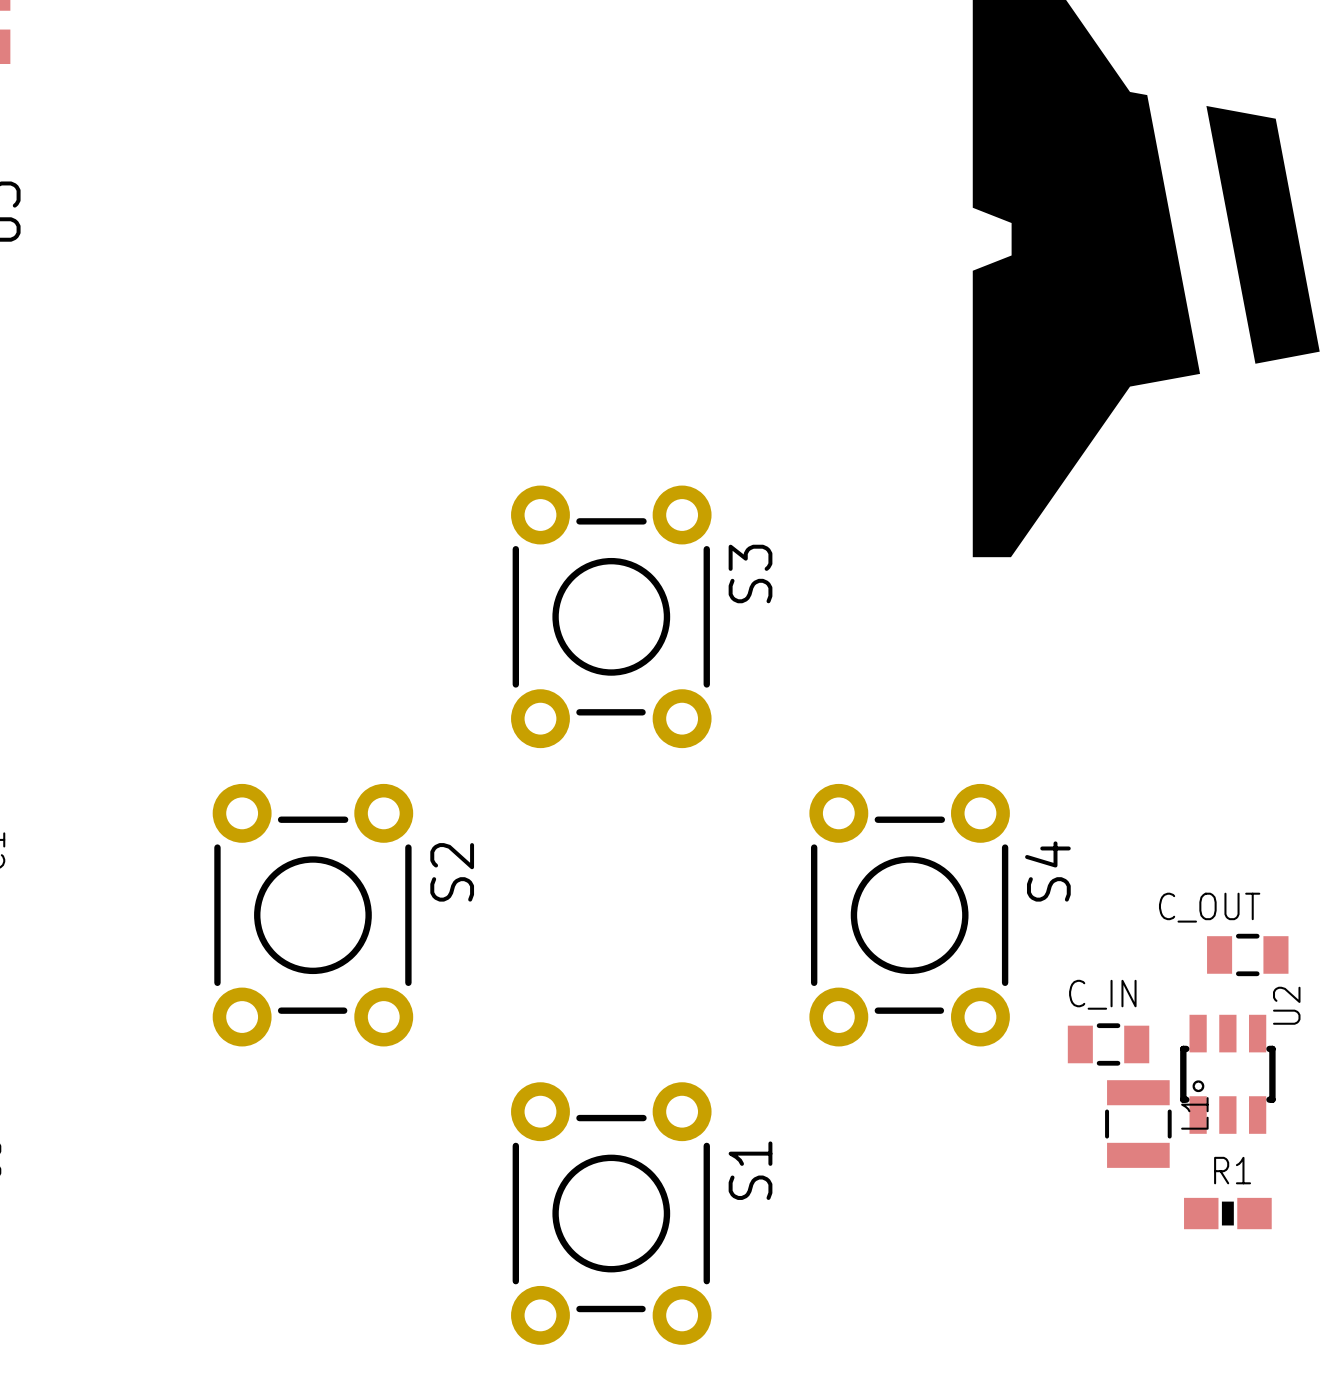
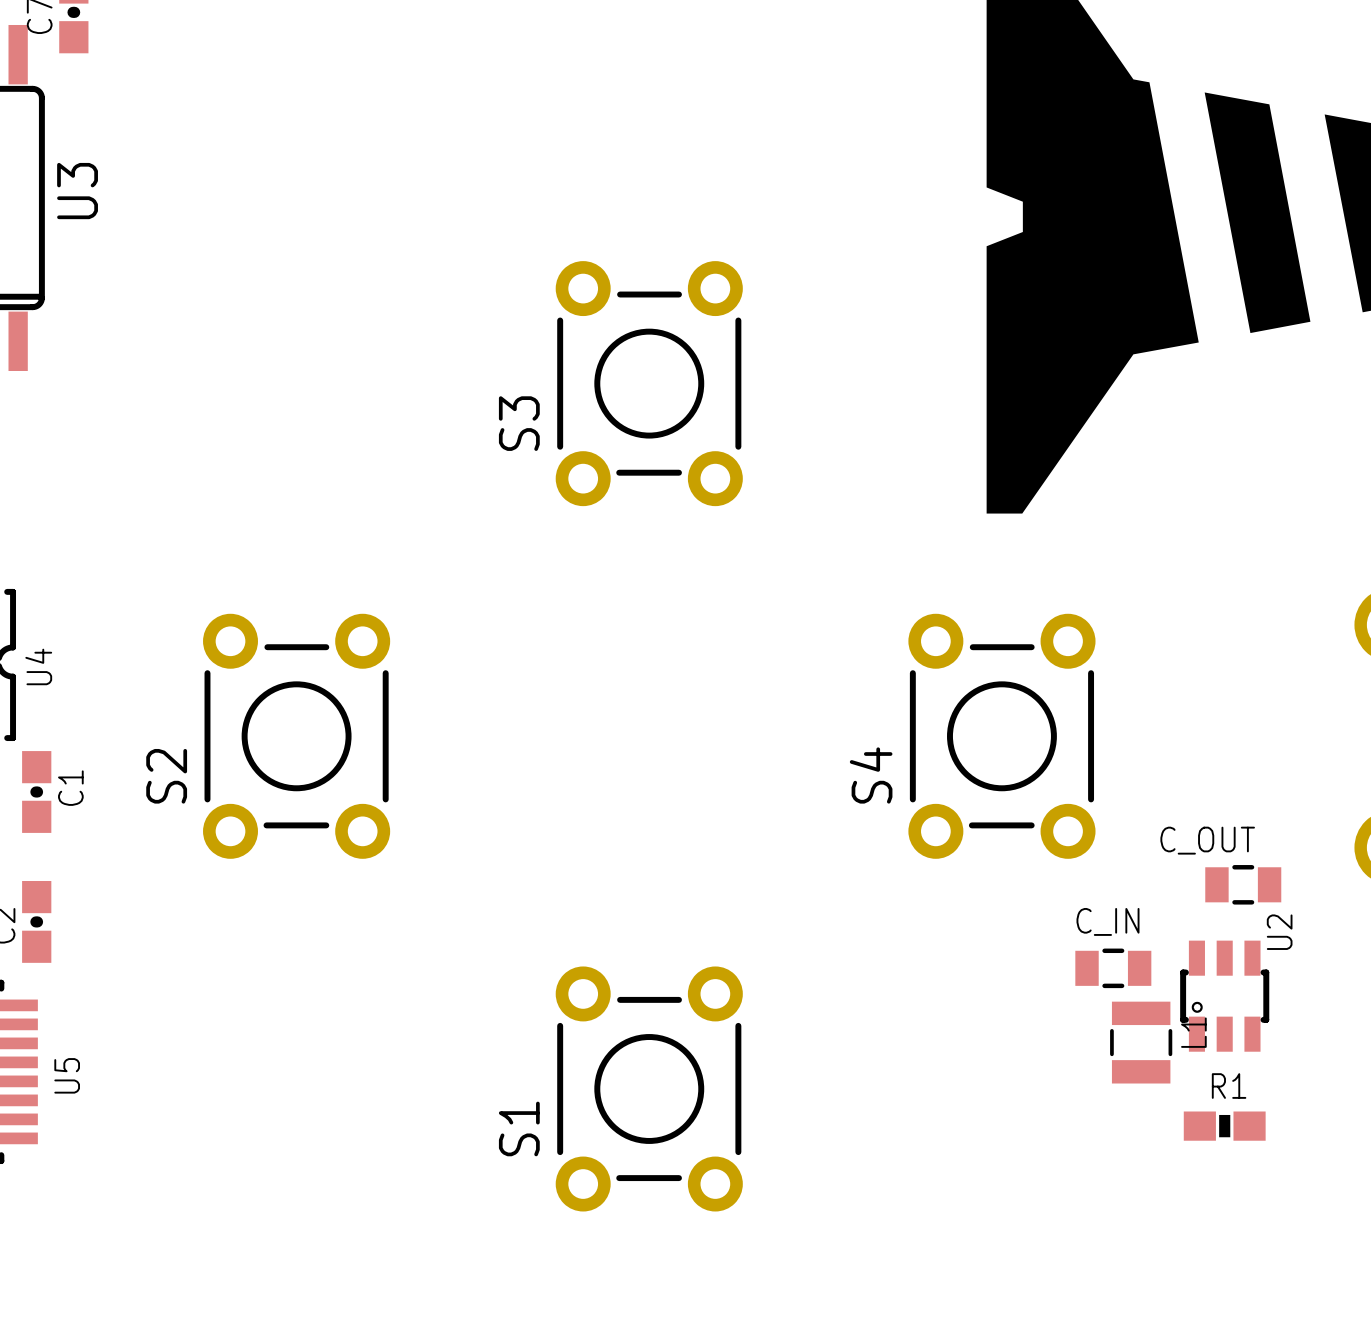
S3 name position: S3 (750, 573) -> S3 (519, 423)
S3 position: (611, 616) -> (649, 383)
S4 name position: S4 (1047, 871) -> S4 (871, 775)
S2 name position: S2 (452, 872) -> S2 (166, 776)
S2 position: (312, 915) -> (296, 736)
S4 position: (909, 915) -> (1001, 736)
S1 name position: S1 (750, 1170) -> S1 (519, 1128)
S1 position: (611, 1213) -> (649, 1088)

